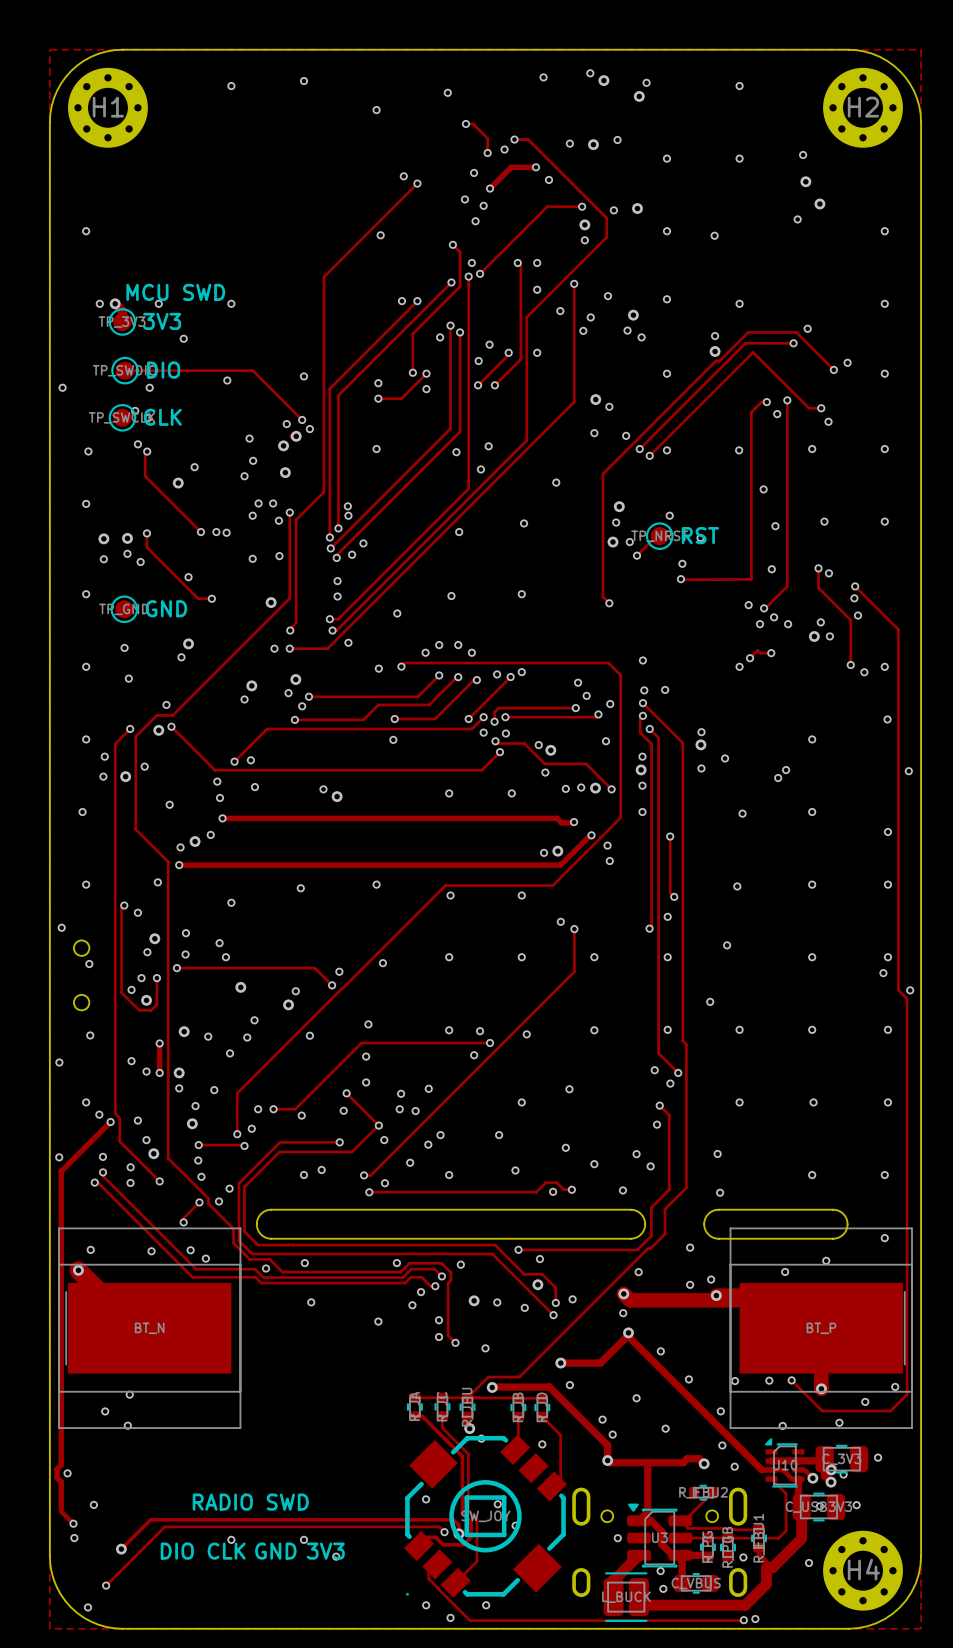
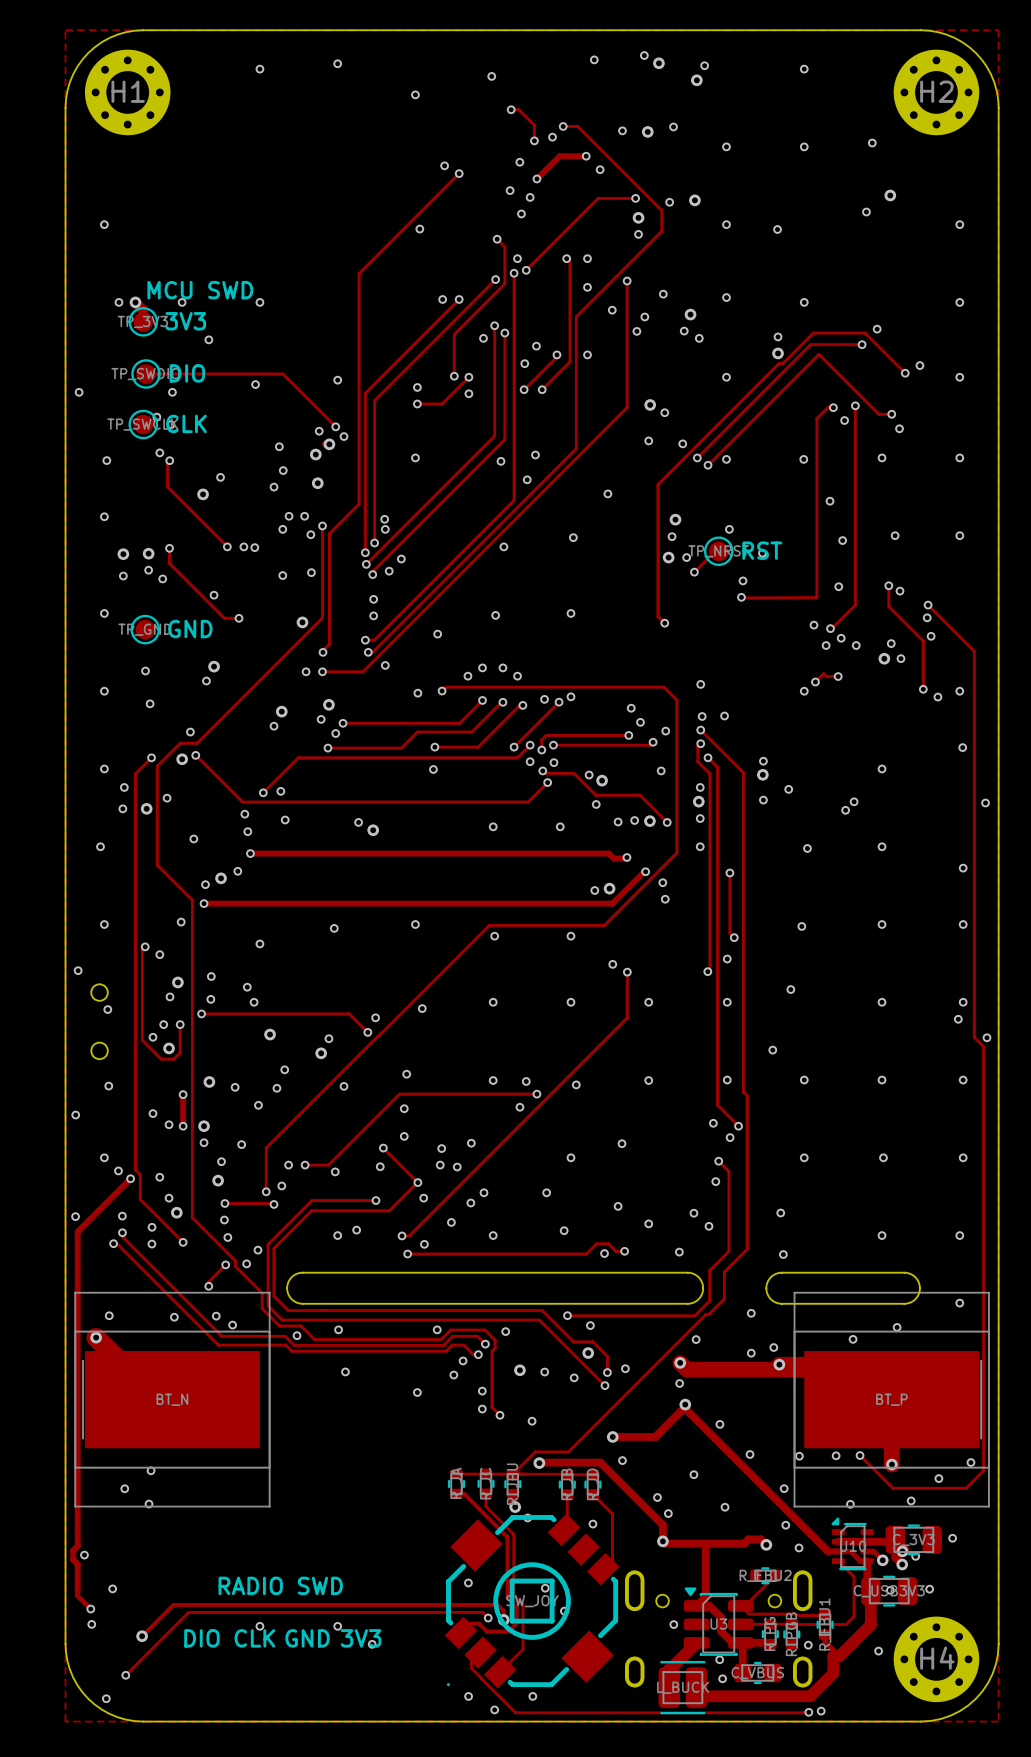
via: (805, 181) -> none

